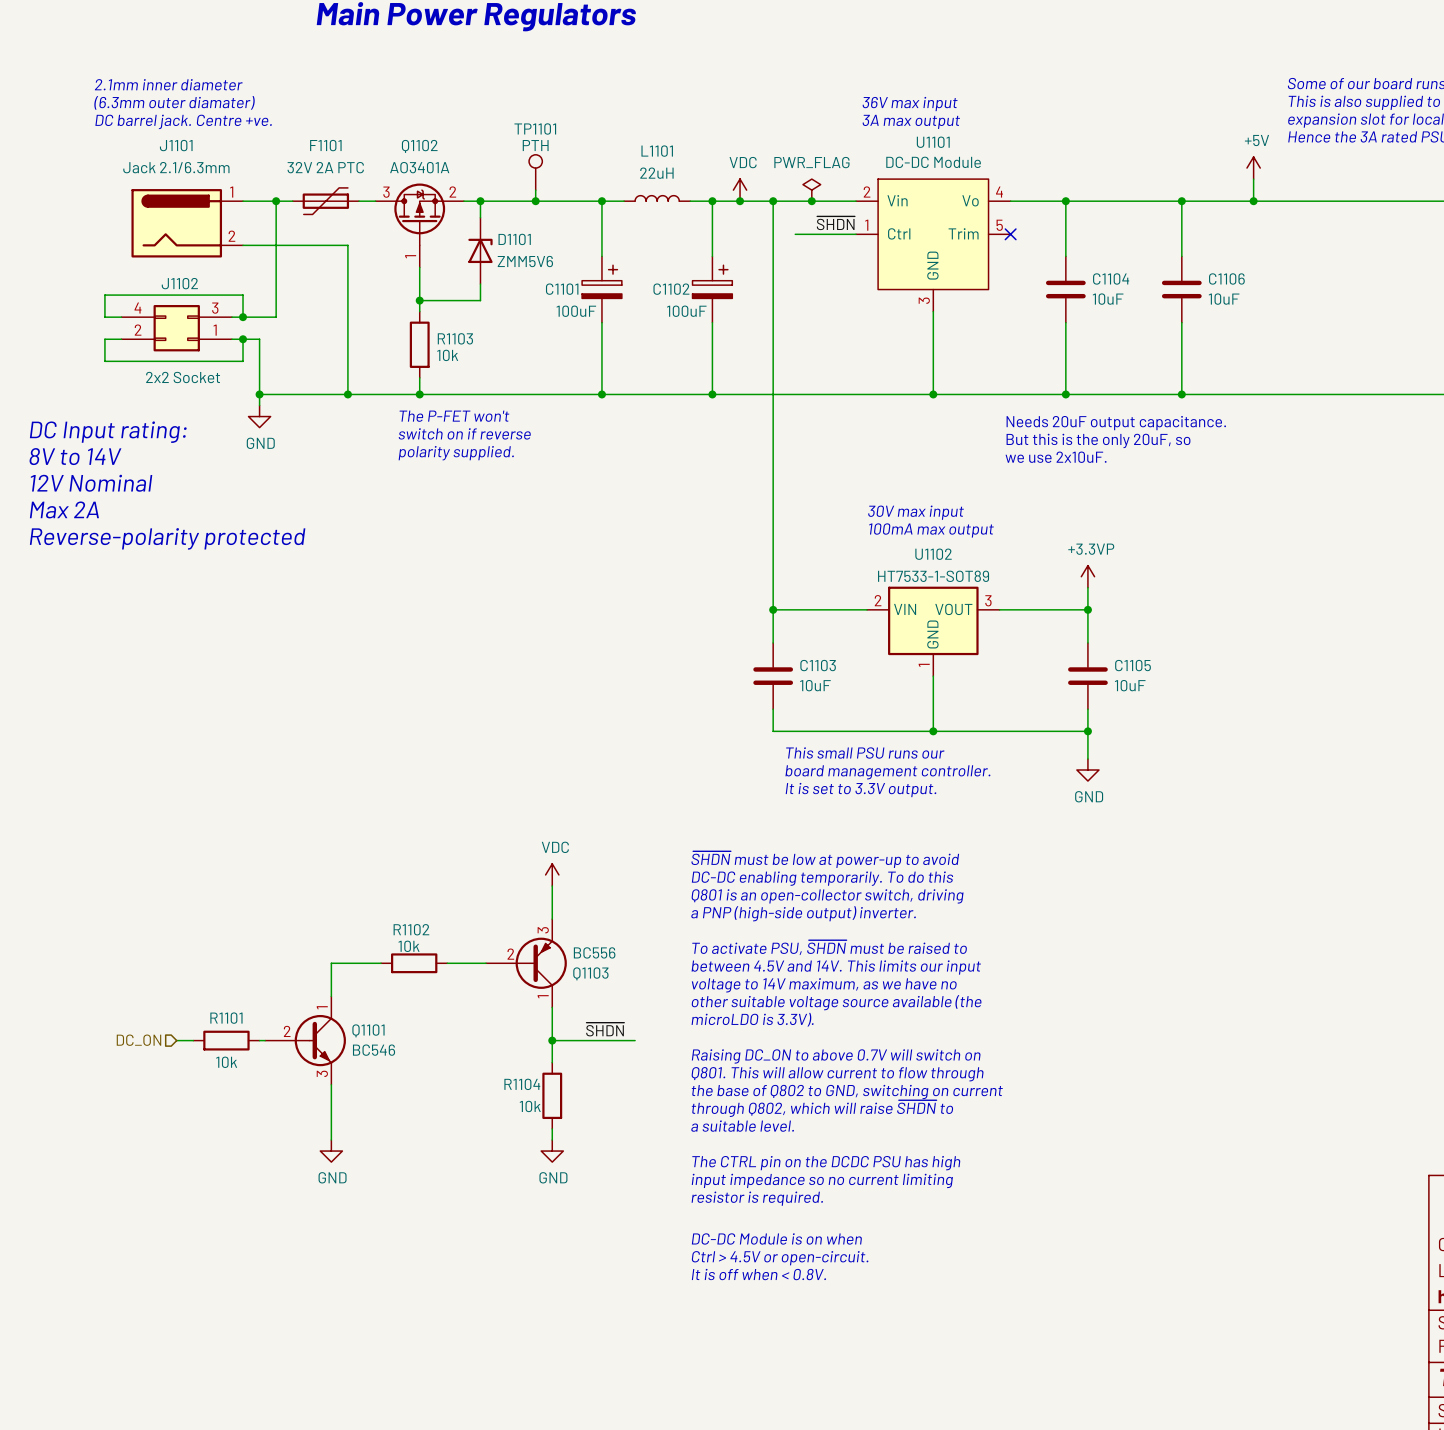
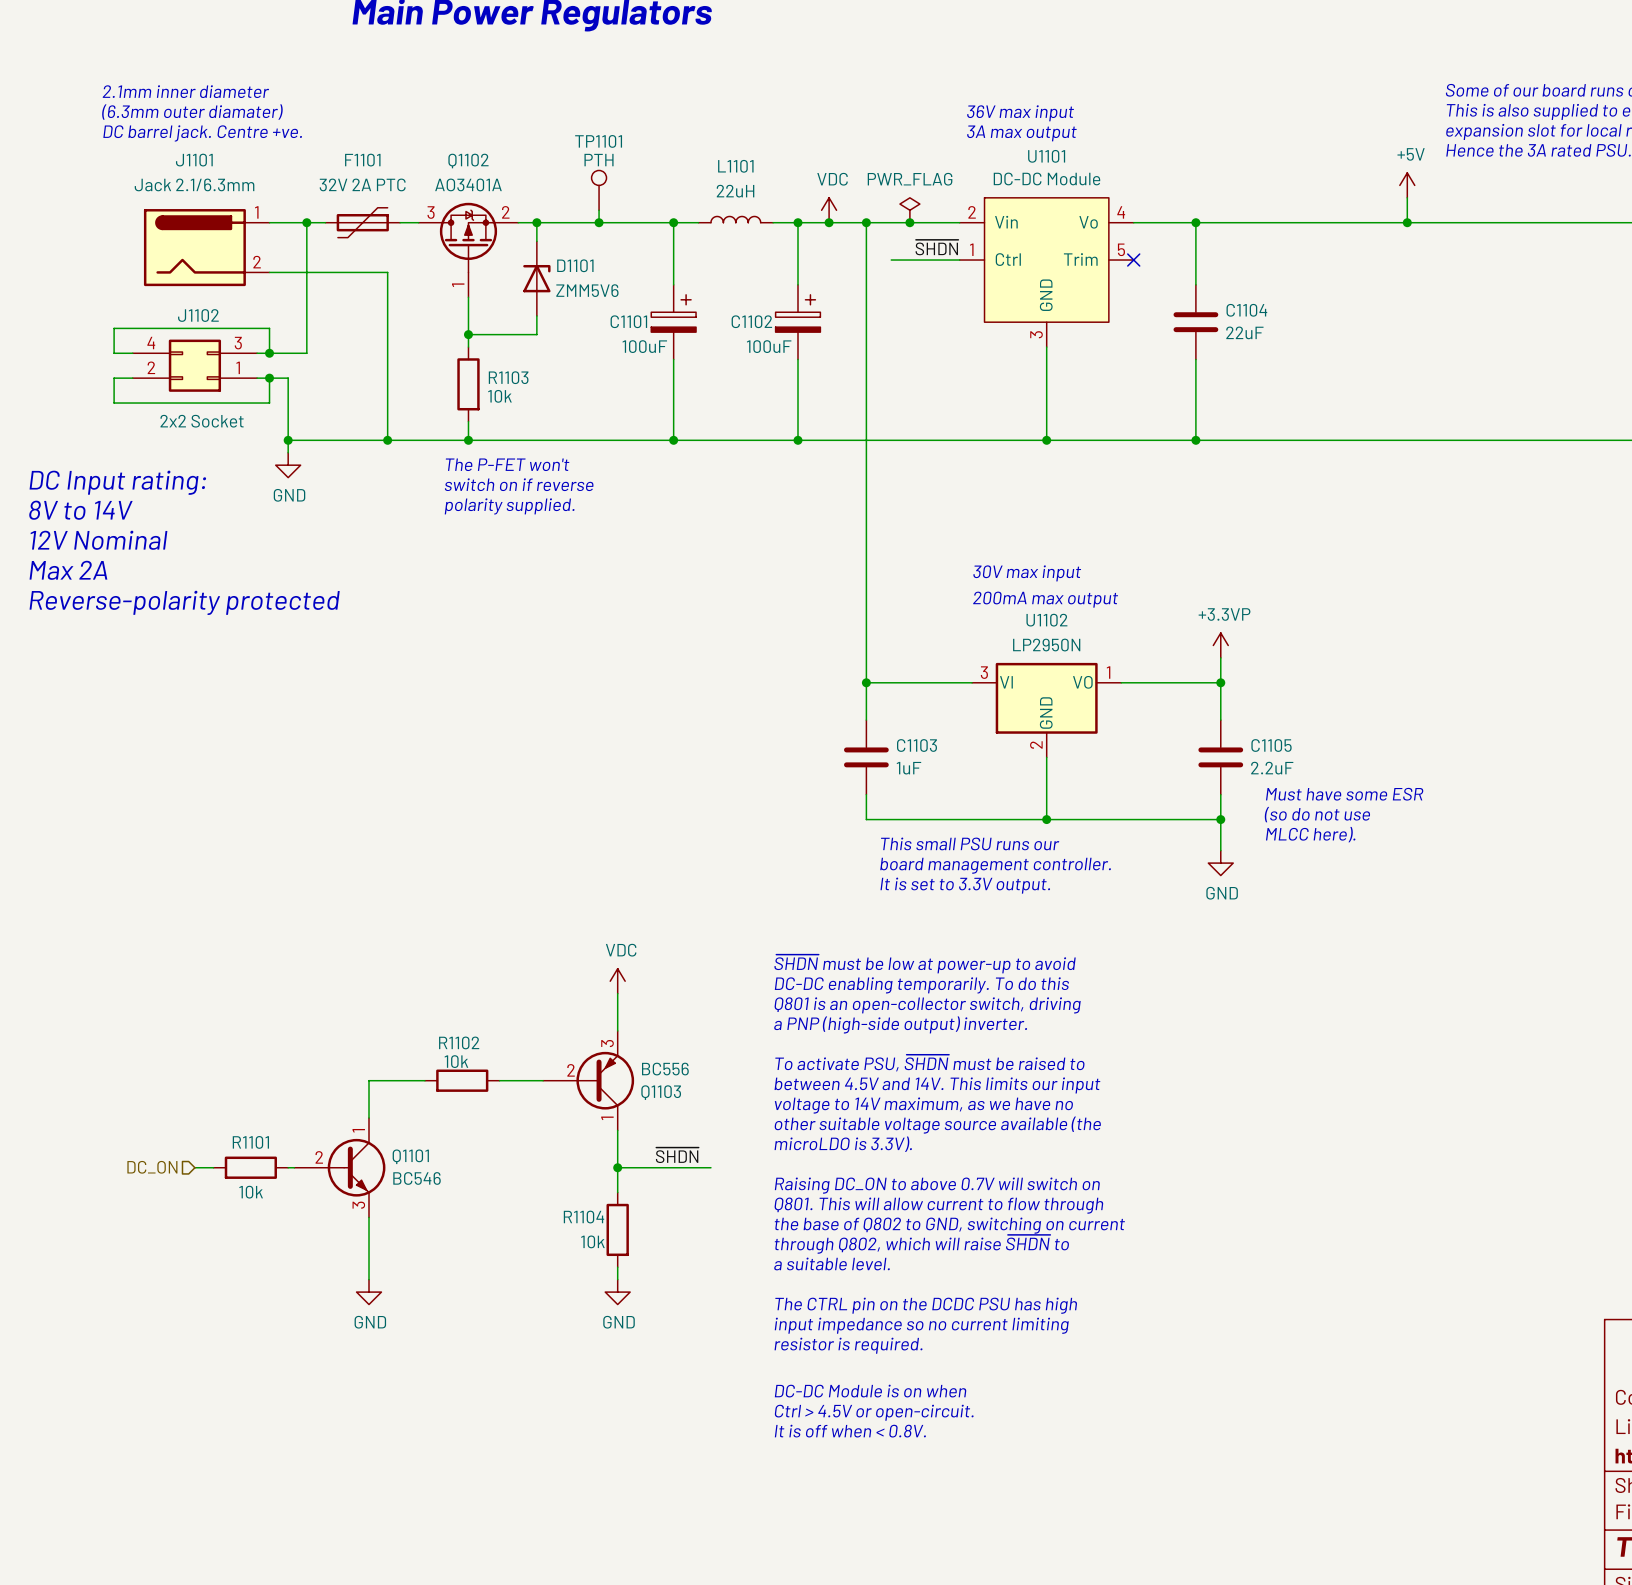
wire: (1181, 201) (1181, 256) -> none
junction: (1181, 201) -> none
C1106: 10uF (1181, 289) -> none
C1104 value: 10uF (1108, 299) -> 22uF (1244, 332)
wire: (1181, 322) (1181, 394) -> none
junction: (1181, 394) -> none
text: Needs 20uF output capacitance. (1116, 423) -> none
text: But this is the only 20uF, so (1098, 440) -> none
text: we use 2x10uF. (1056, 457) -> none
text: 100mA max output (931, 530) -> 200mA max output (1045, 599)
U1102 value: HT7533-1-SOT89 (933, 576) -> LP2950N (1046, 645)
U1102 symbol: [867, 586, 1000, 677] -> [972, 662, 1122, 758]
C1103 value: 10uF (815, 685) -> 1uF (908, 768)
C1105 value: 10uF (1130, 685) -> 2.2uF (1272, 768)
text: none -> Must have some ESR (1344, 794)
text: none -> (so do not use (1317, 814)
text: none -> MLCC here). (1310, 834)

